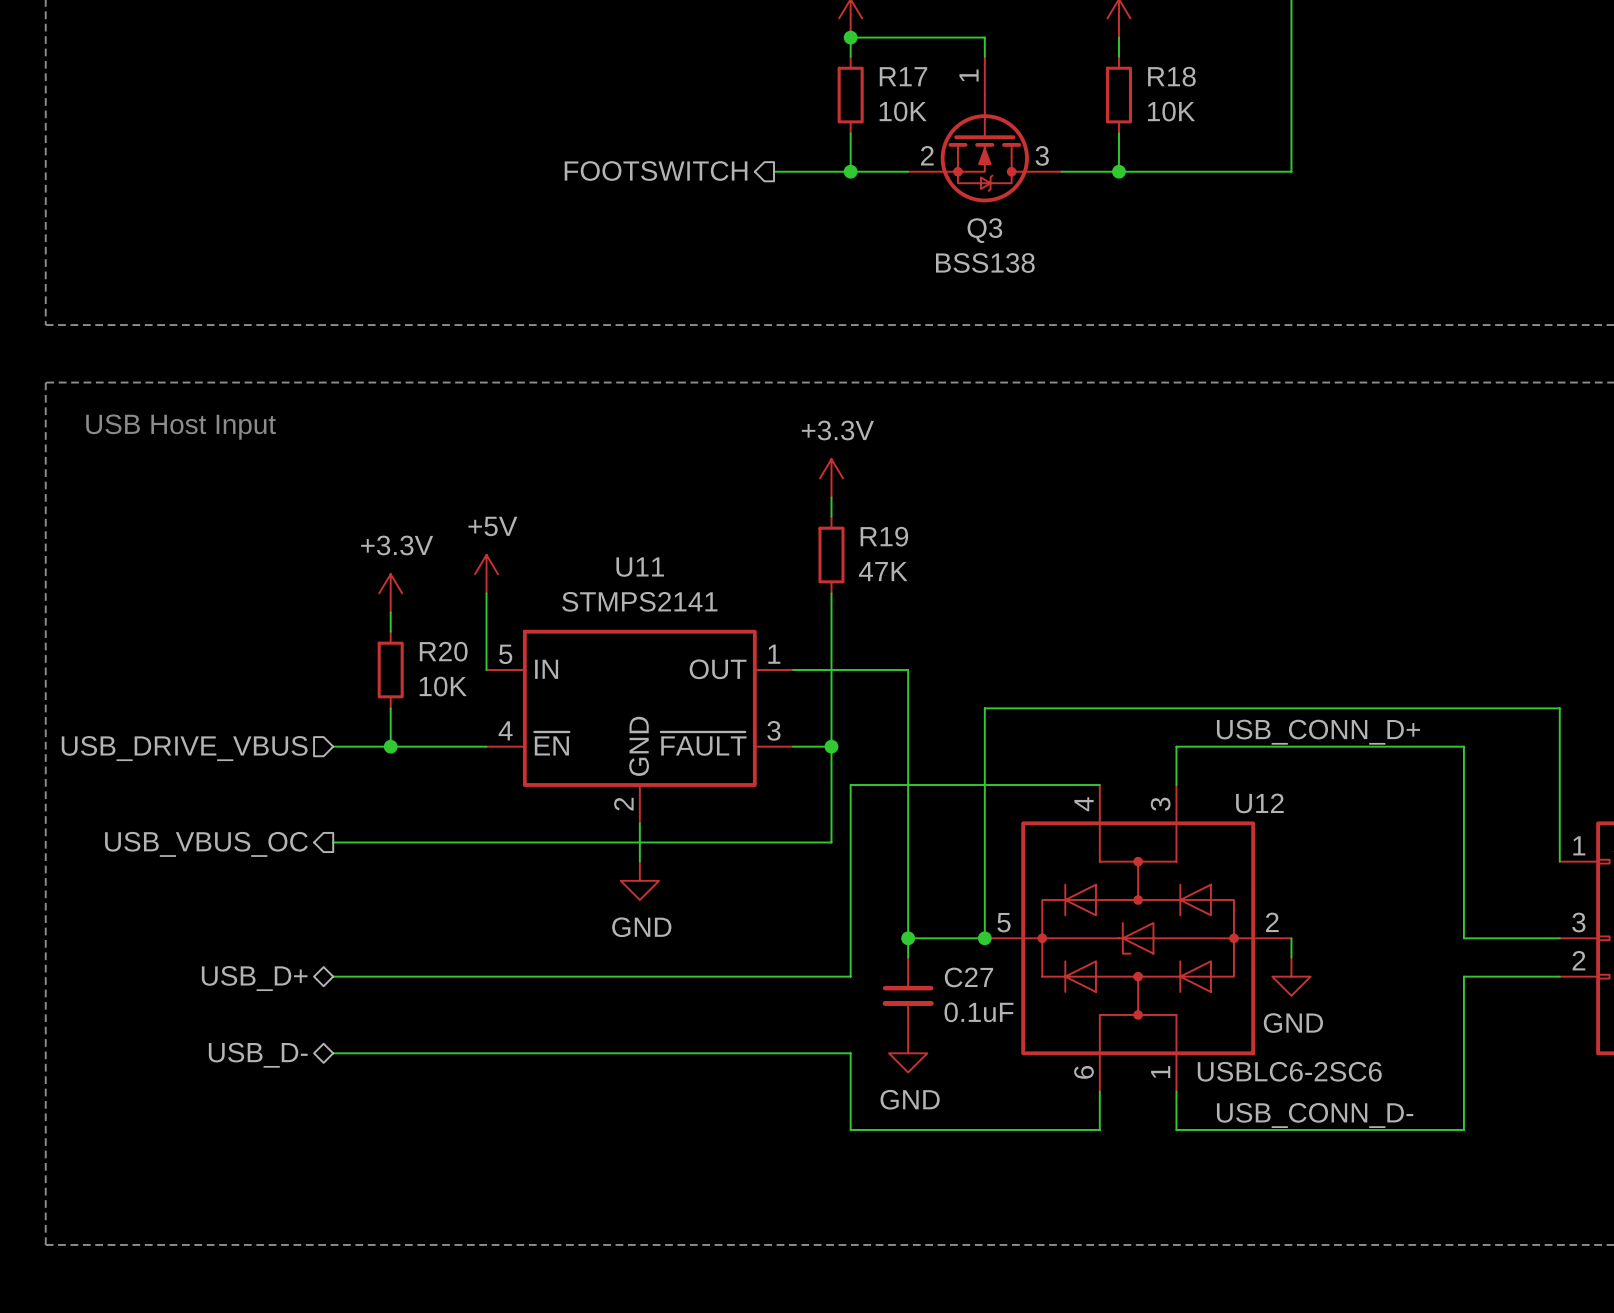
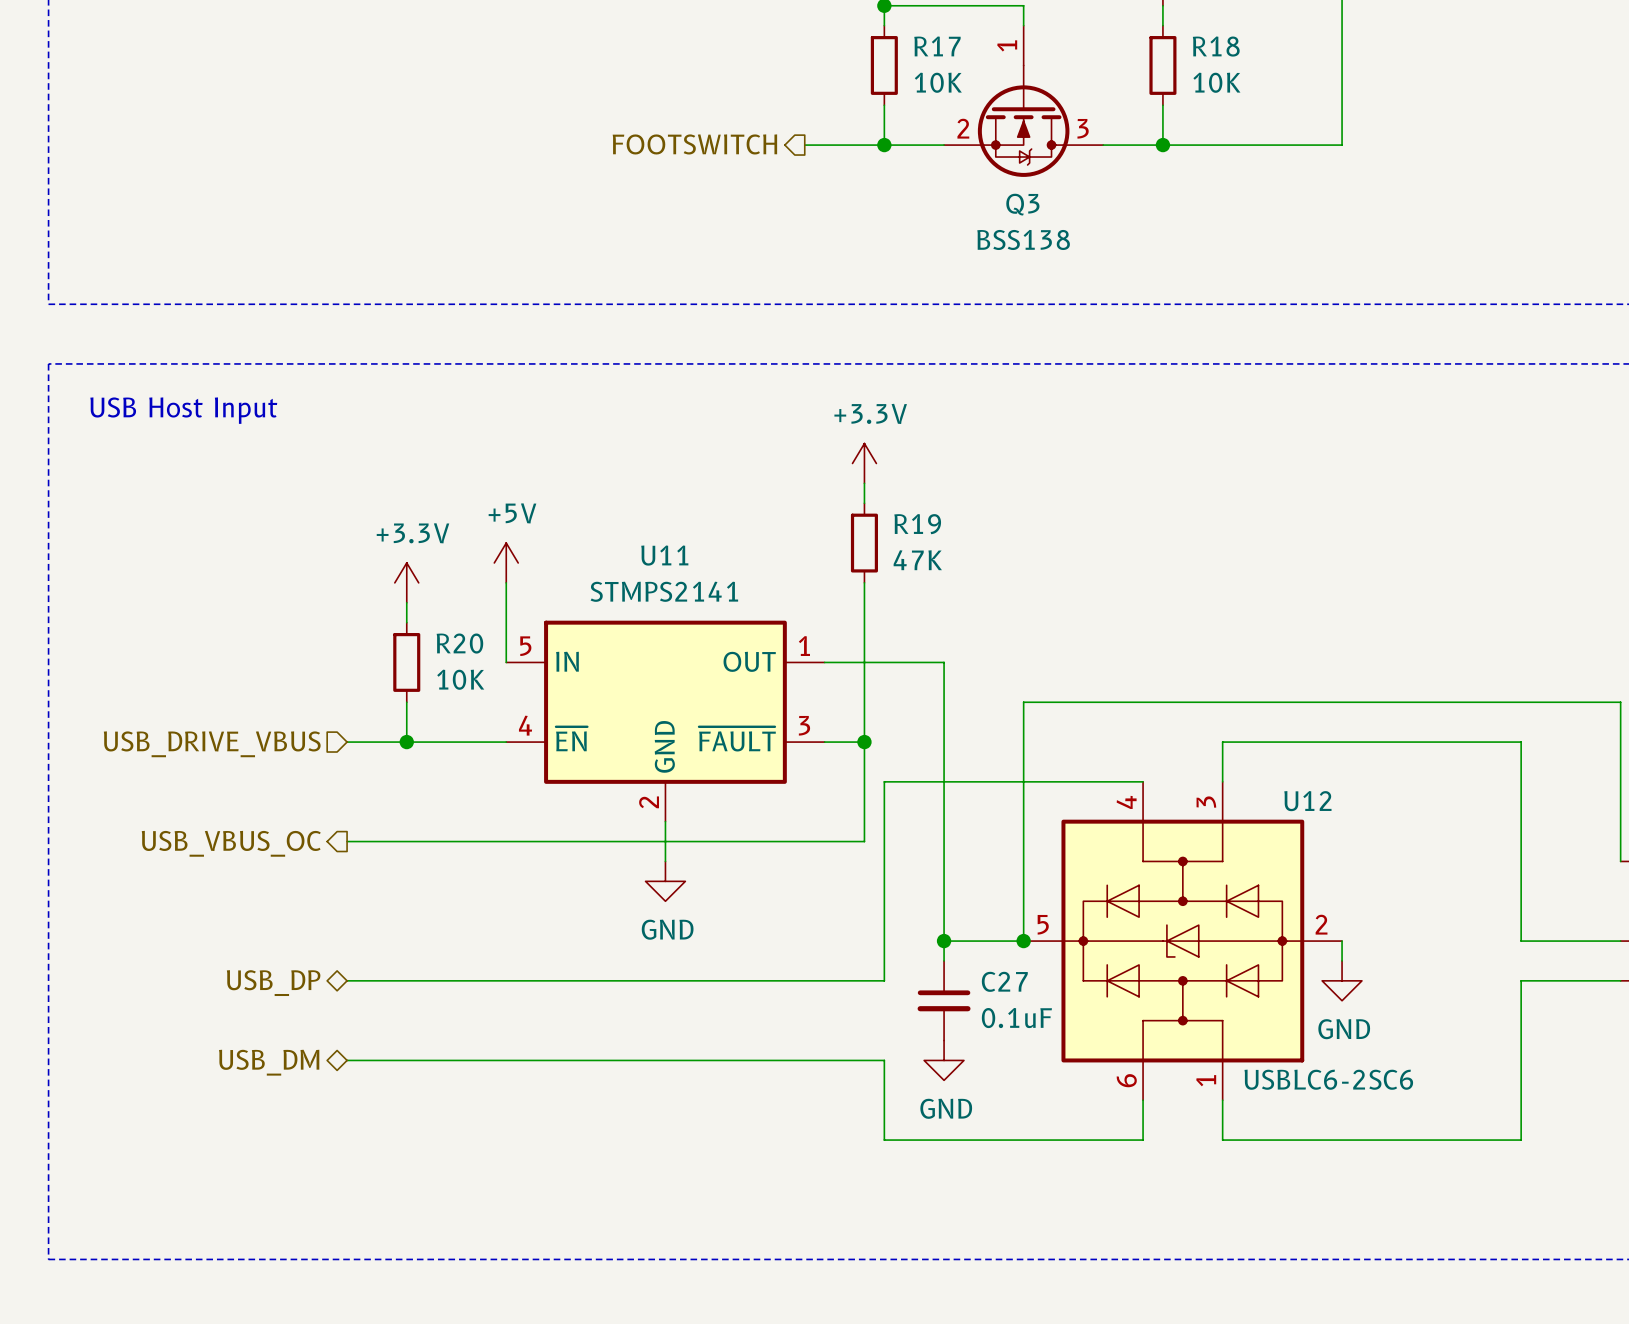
label: USB_CONN_D+ (1318, 732) -> none
hierarchical label: USB_D+ (254, 978) -> USB_DP (273, 983)
hierarchical label: USB_D- (258, 1055) -> USB_DM (269, 1062)
label: USB_CONN_D- (1315, 1115) -> none

